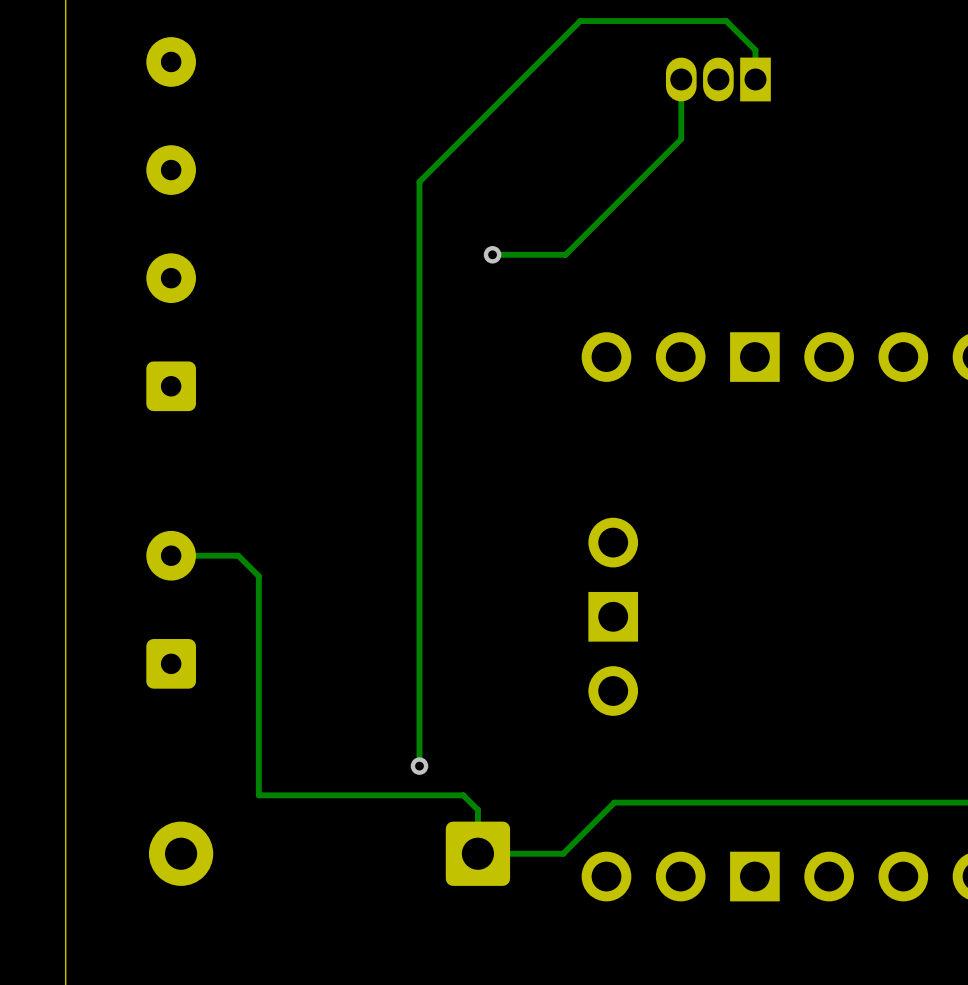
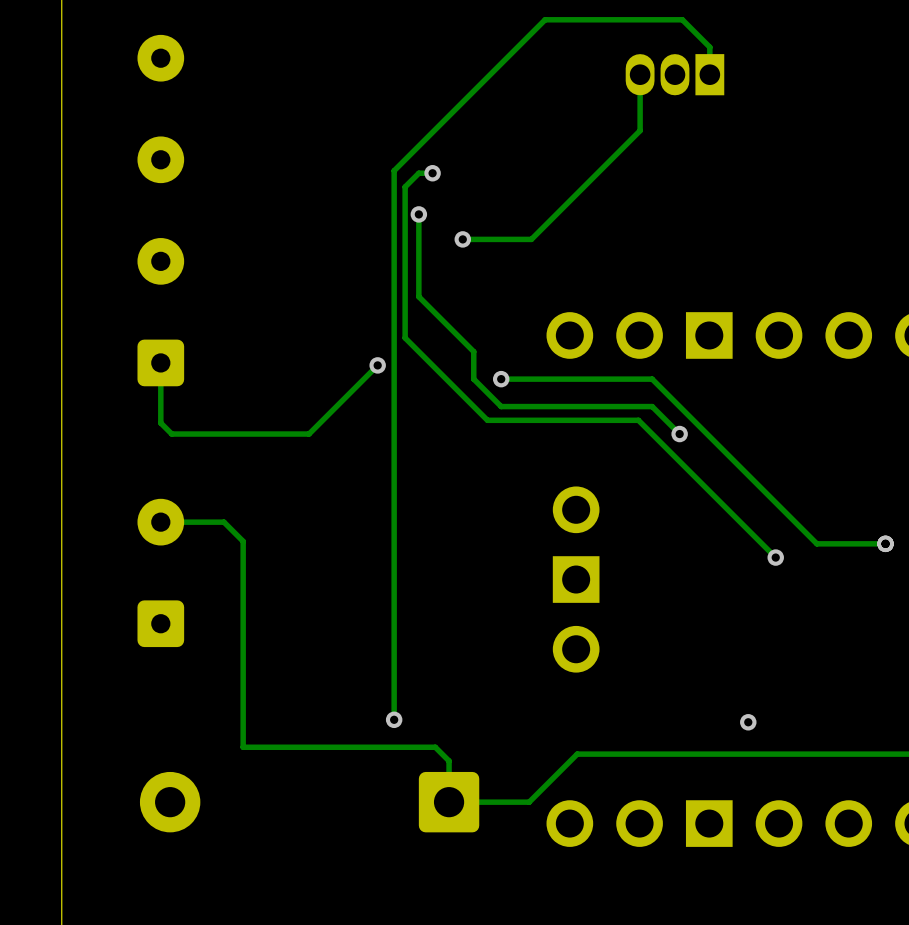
track: none -> (432, 173) (418, 173) (405, 186) (405, 337) (487, 420) (638, 420) (775, 557)
via: none -> (432, 173)
track: none -> (418, 214) (418, 296) (473, 351) (473, 379) (501, 406) (652, 406) (679, 434)
via: none -> (418, 214)
track: none -> (160, 362) (160, 423) (171, 434) (309, 434) (377, 365)
via: none -> (377, 365)
track: none -> (501, 379) (652, 379) (816, 543) (885, 543)
via: none -> (501, 379)
via: none -> (679, 434)
via: none -> (885, 543)
via: none -> (775, 557)
via: none -> (748, 722)

